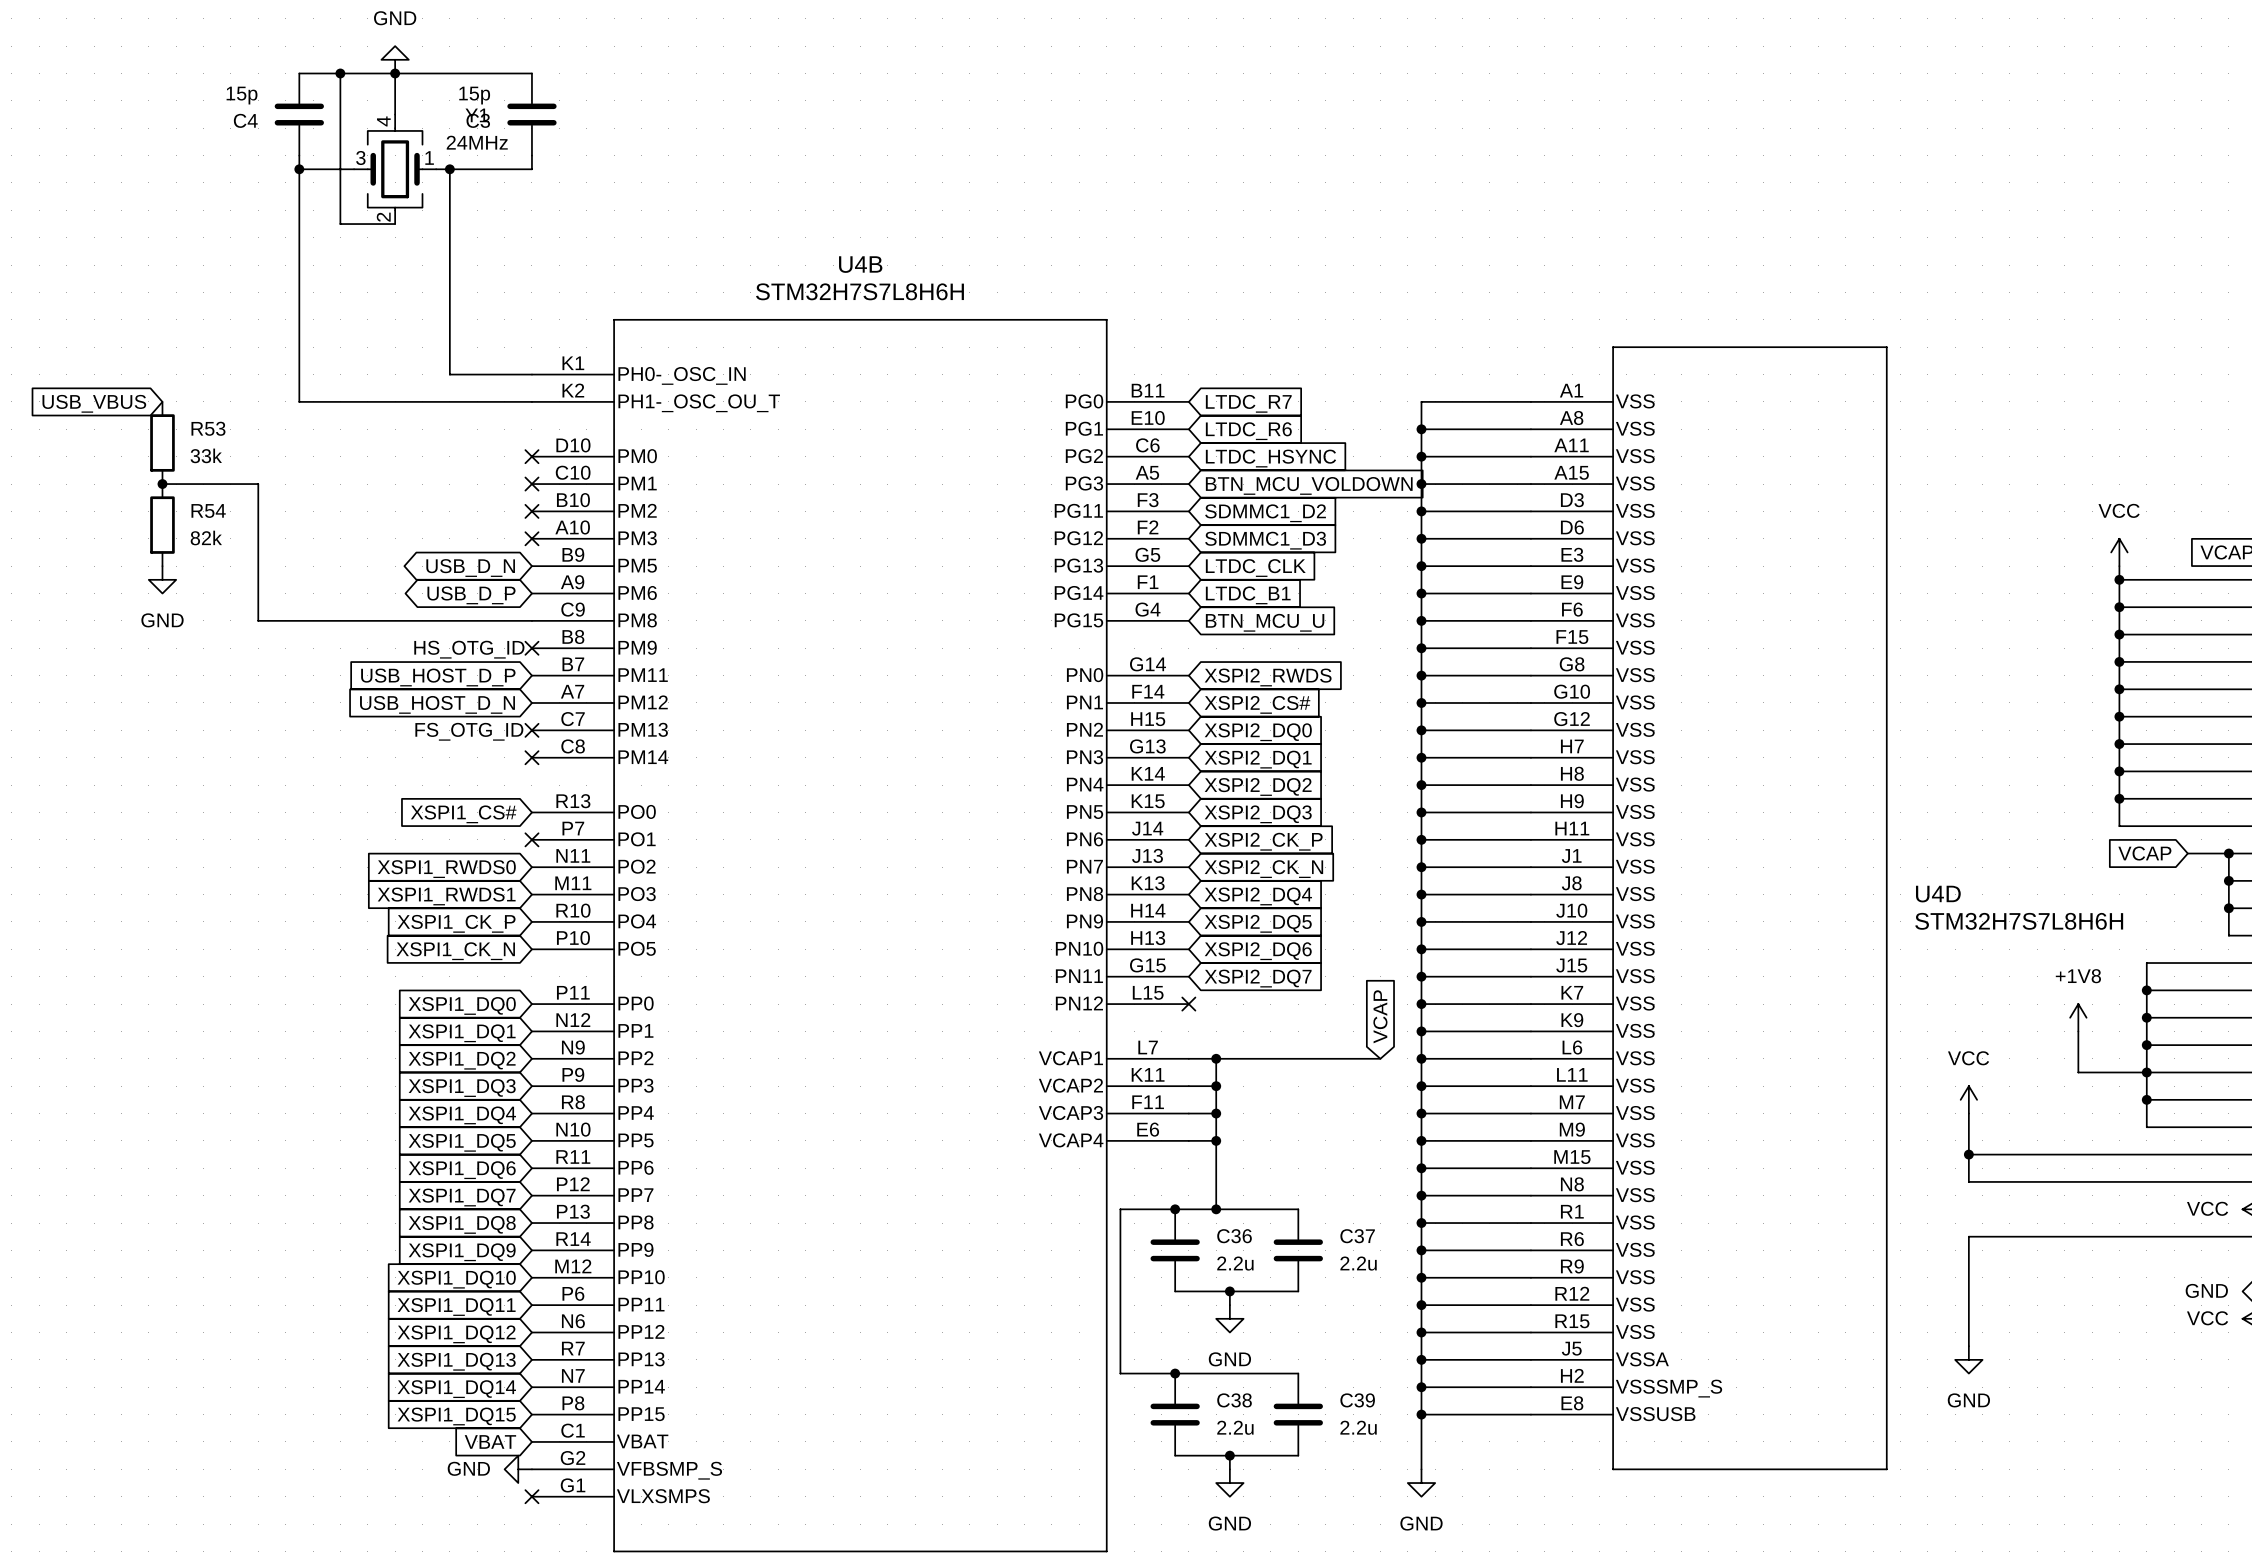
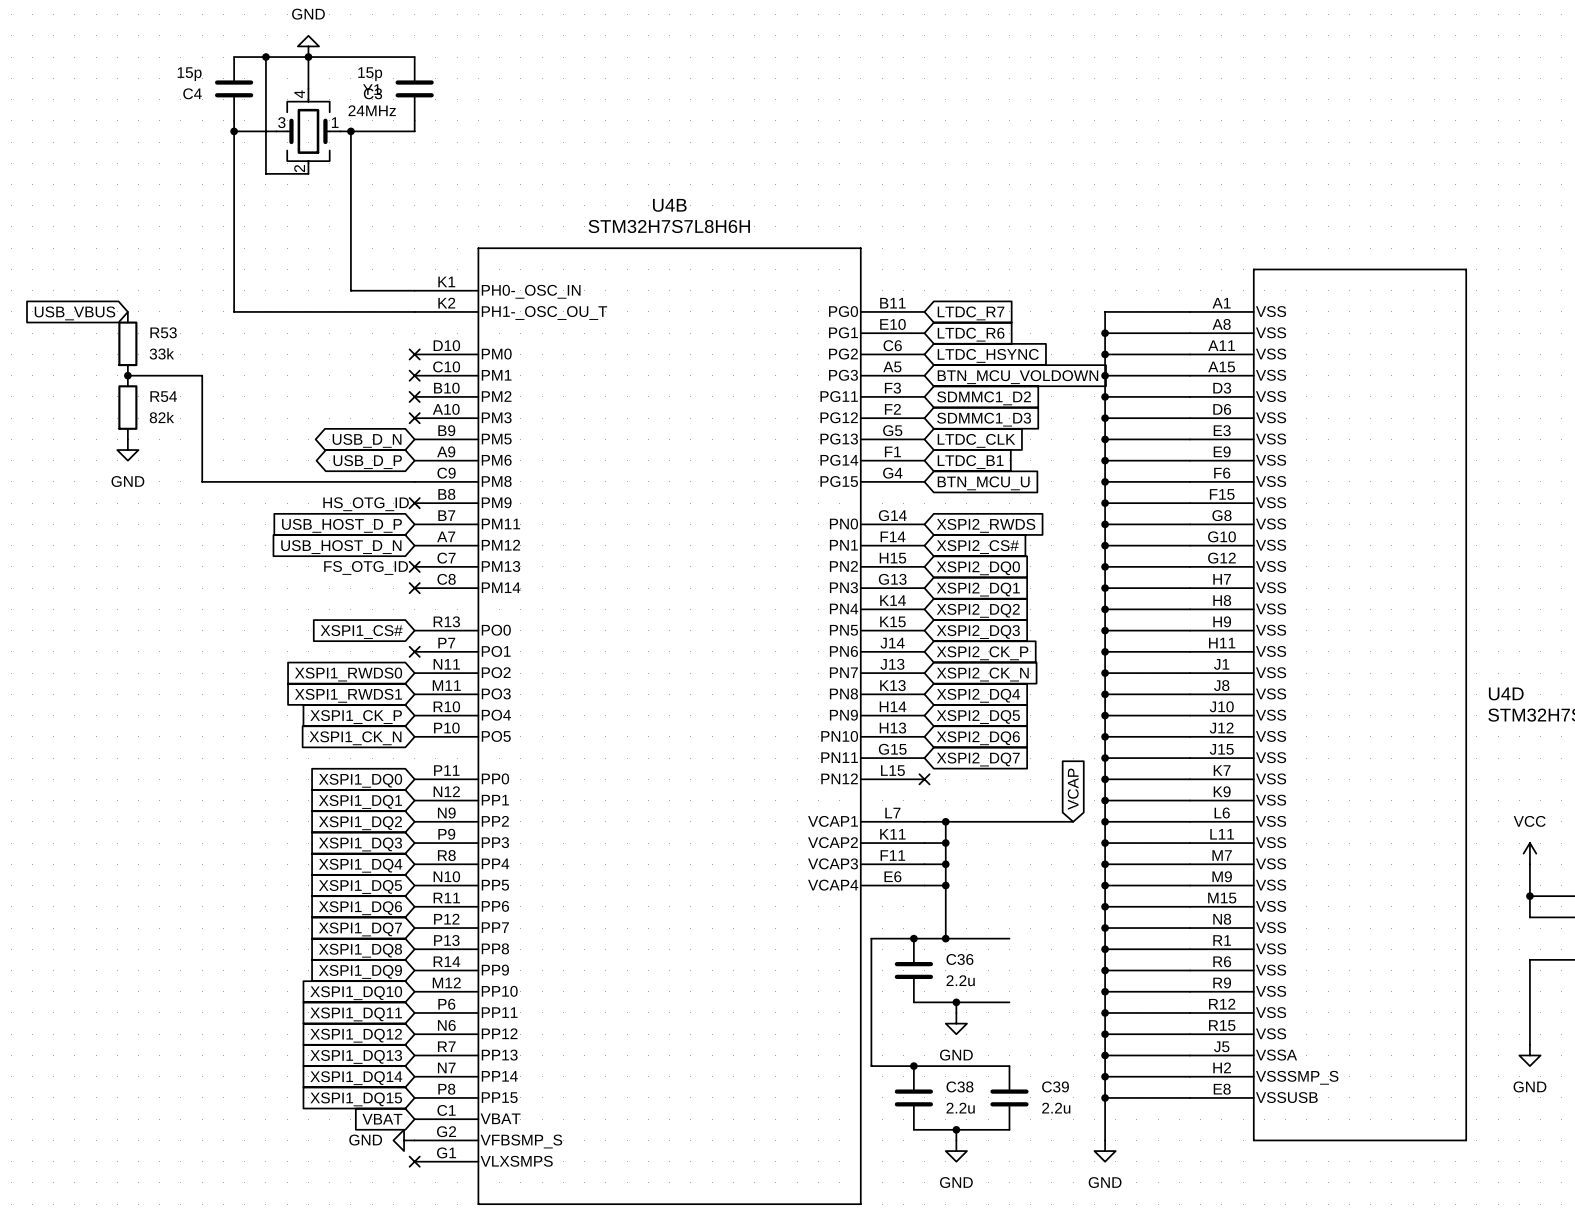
C37: 2.2u (1298, 1250) -> none

